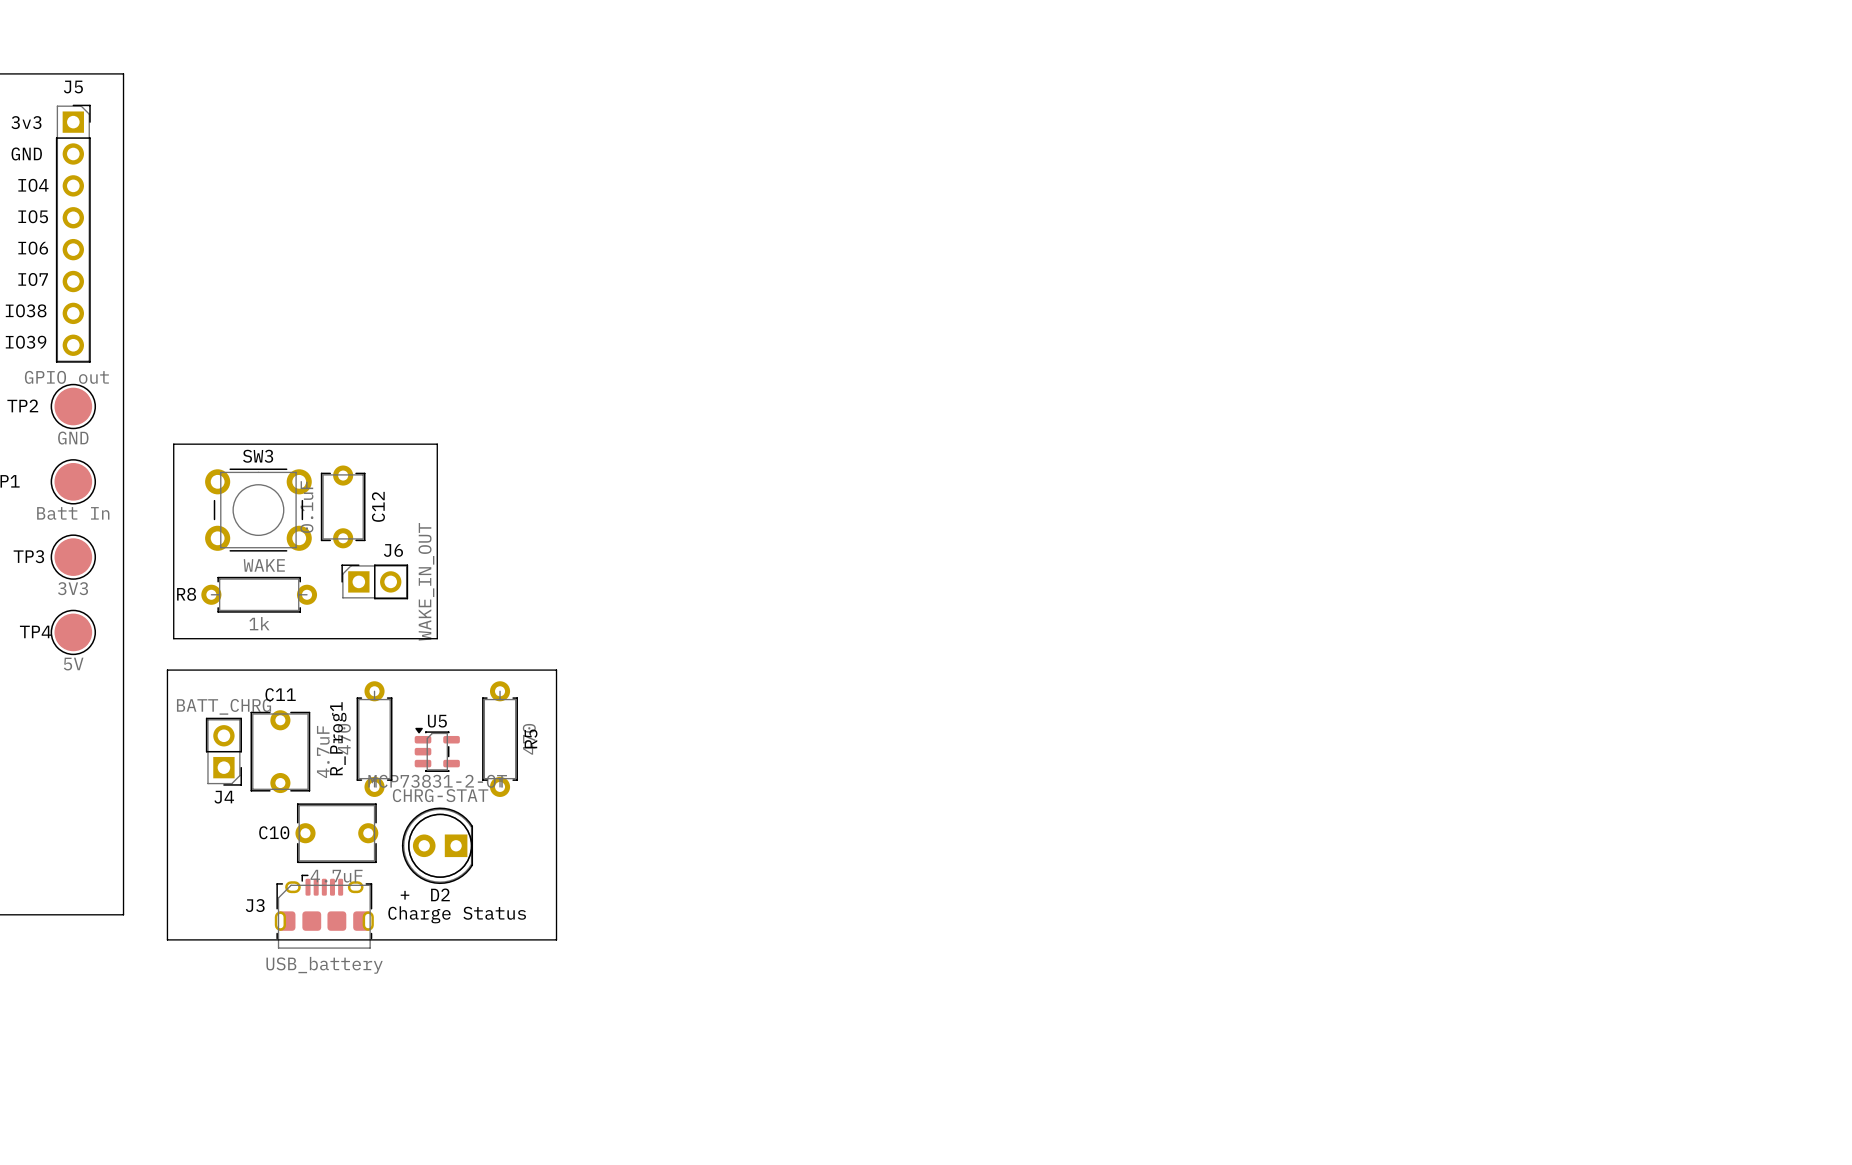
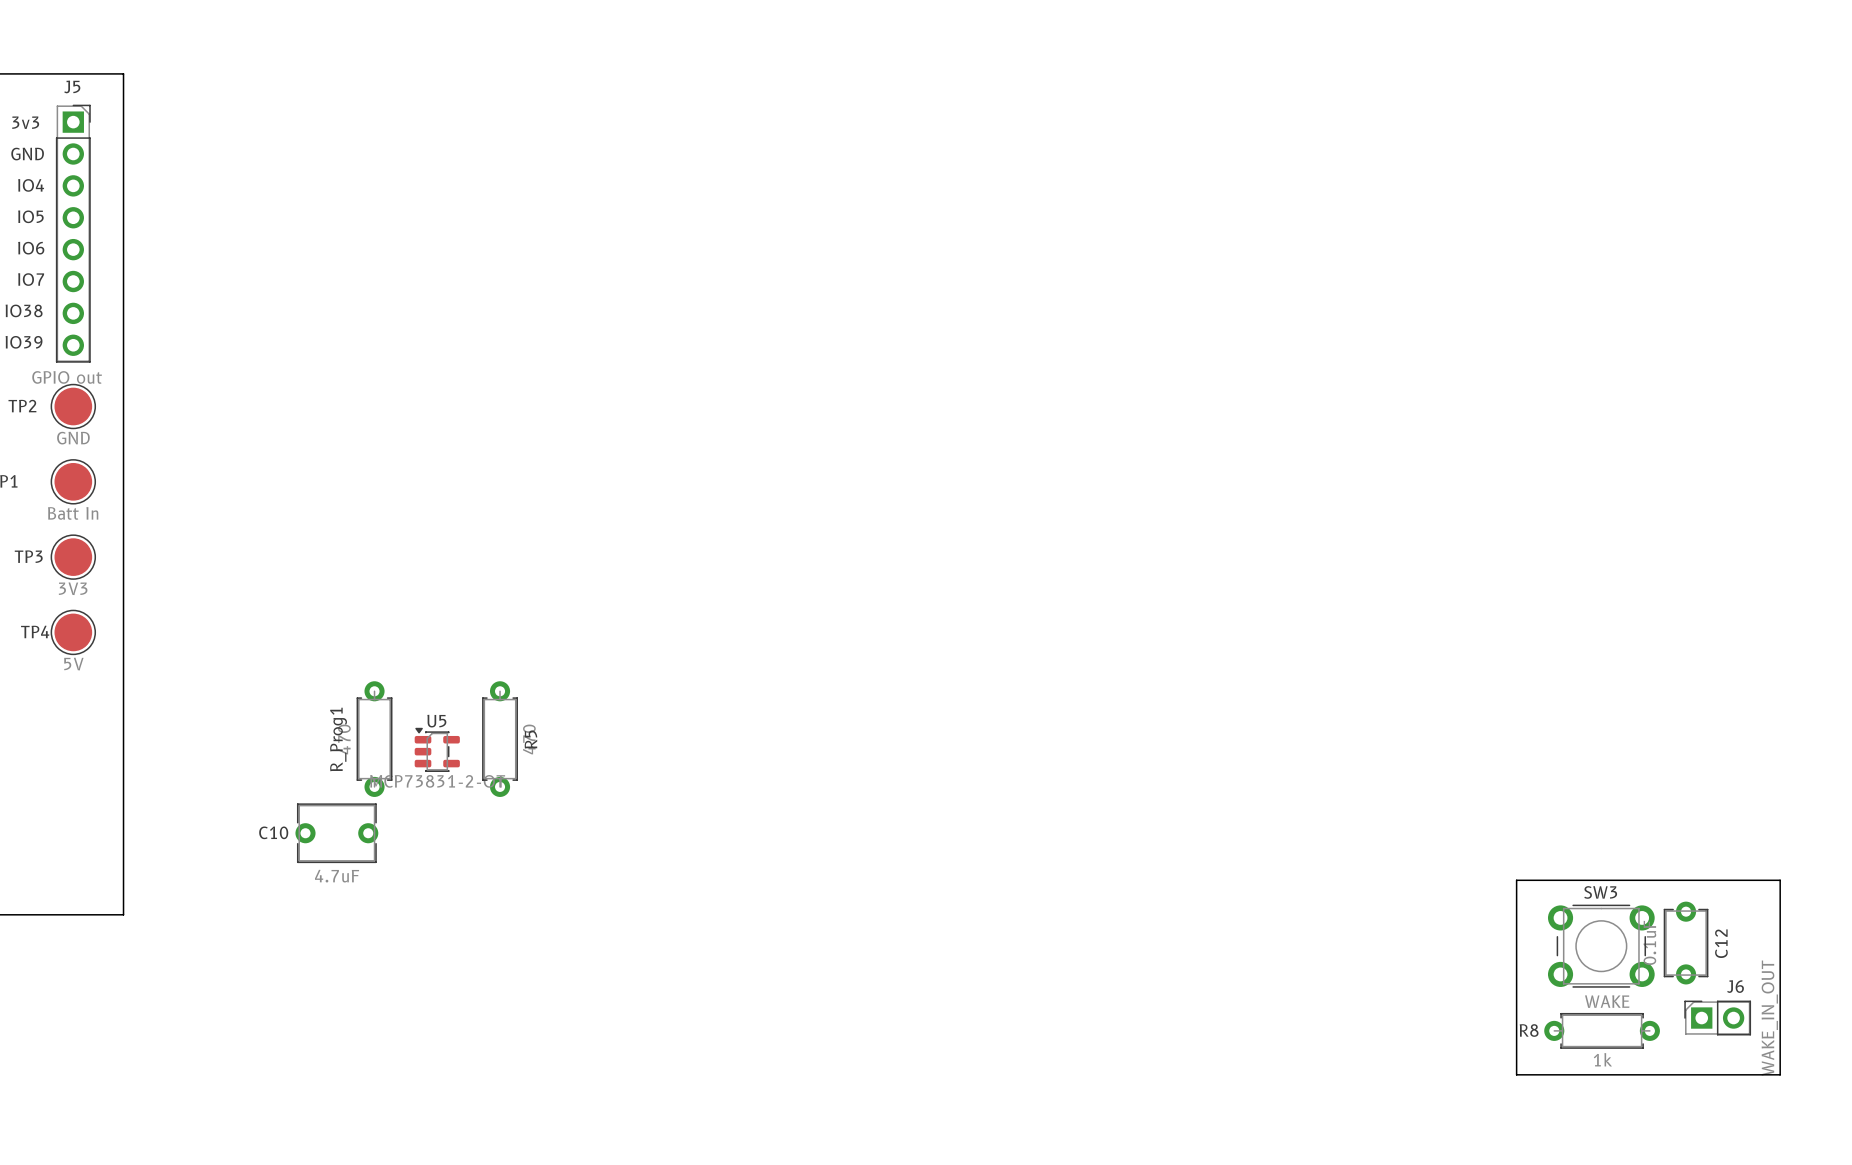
board edge: (173, 444) (437, 444) (437, 638) (173, 638) (173, 444) -> none
C12 position: (343, 506) -> (1686, 943)
SW3 position: (258, 510) -> (1601, 946)
J6 position: (374, 581) -> (1717, 1018)
R8 position: (259, 594) -> (1602, 1030)
board edge: (167, 670) (556, 670) (556, 939) (167, 939) (167, 670) -> none
J4: BATT_CHRG (223, 751) -> none
C11: 4.7uF (280, 751) -> none
D2: CHRG-STAT (437, 845) -> none
board edge: none -> (1516, 880) (1780, 880) (1780, 1074) (1516, 1074) (1516, 880)
text: + (405, 895) -> none
J3: USB_battery (324, 911) -> none
text: Charge Status (457, 914) -> none

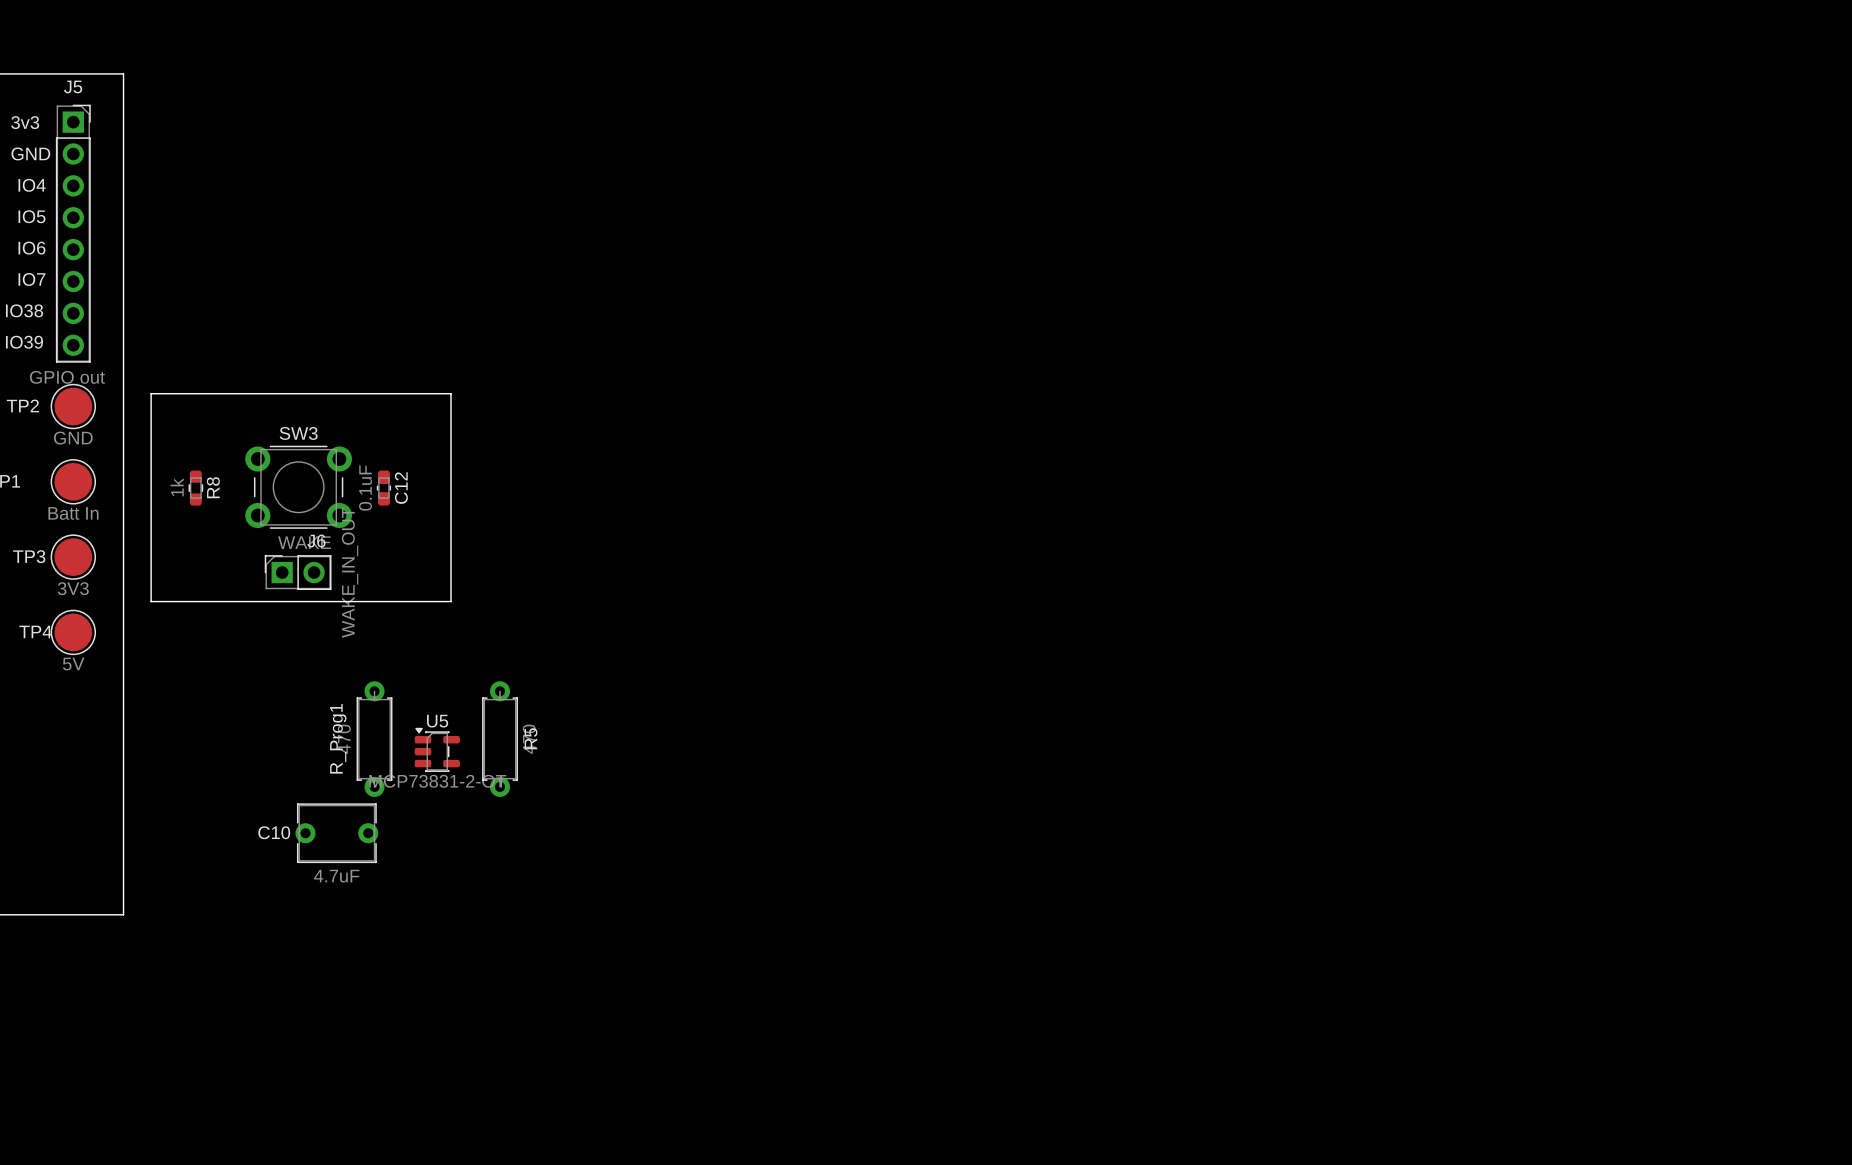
board edge: none -> (151, 393) (451, 393) (451, 601) (151, 601) (151, 393)
board edge: (1516, 880) (1780, 880) (1780, 1074) (1516, 1074) (1516, 880) -> none
C12 footprint: [1663, 901, 1709, 985] -> [376, 470, 392, 506]
SW3 position: (1601, 946) -> (298, 487)
R8 footprint: [1544, 1012, 1660, 1049] -> [188, 470, 204, 506]
J6 position: (1717, 1018) -> (298, 572)
R8 name position: R8 (1529, 1030) -> R8 (213, 487)
R8 value position: 1k (1602, 1059) -> 1k (177, 487)

